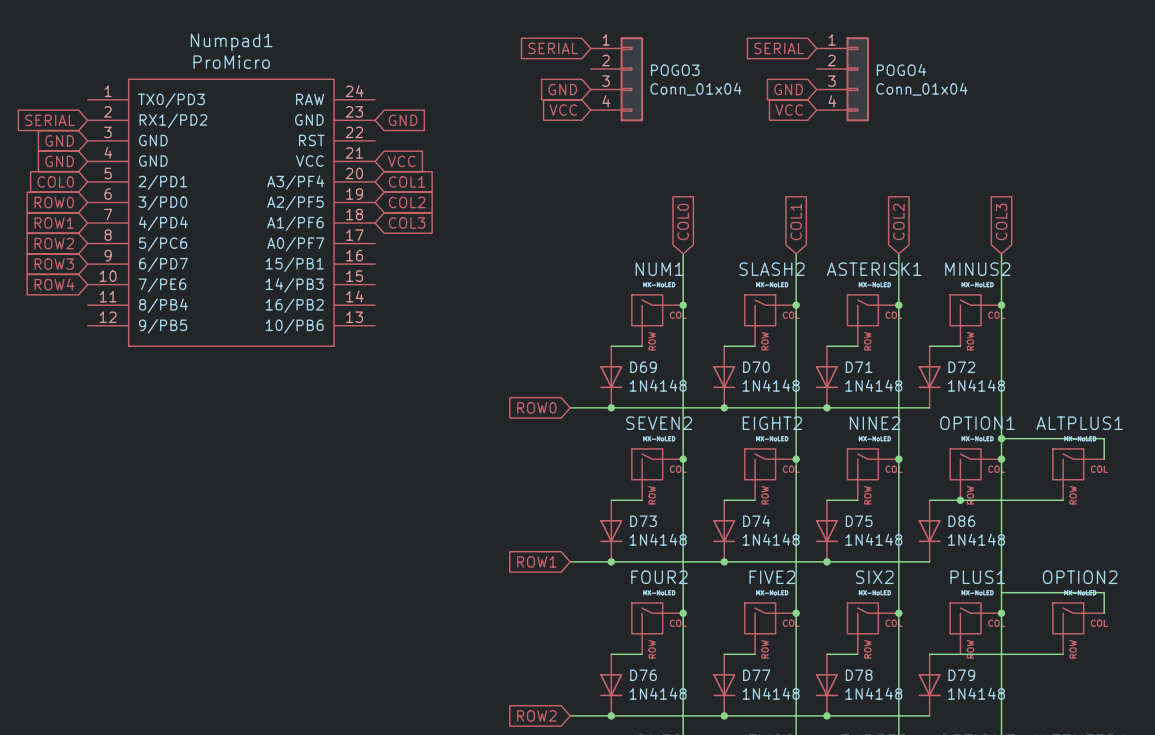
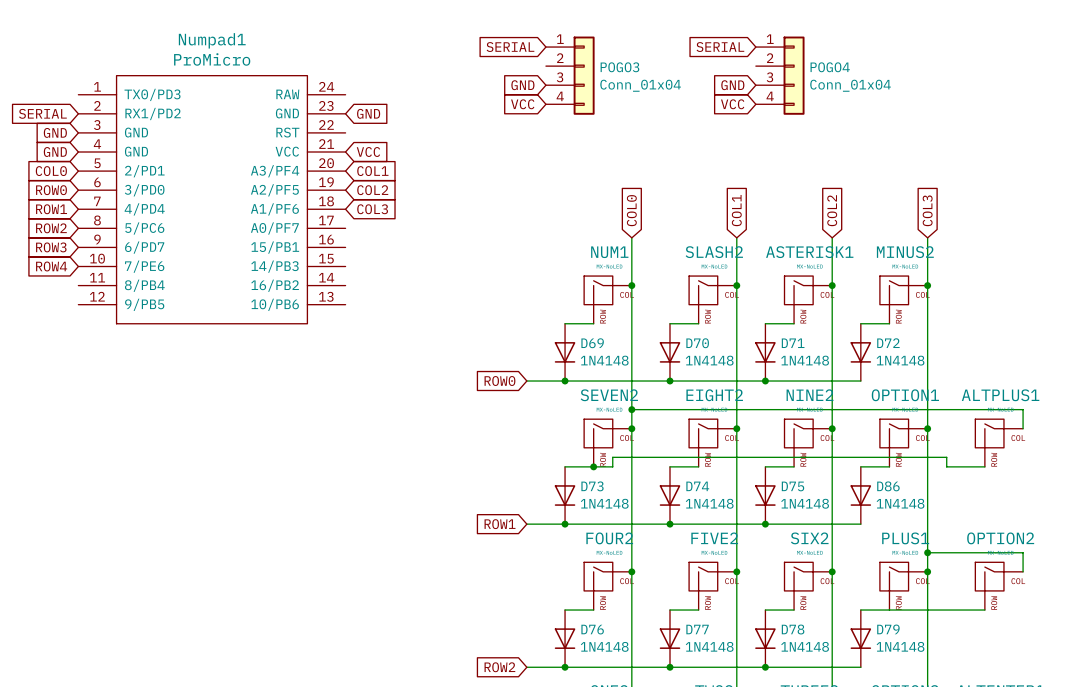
wire: none -> (631, 409) (927, 409)
junction: none -> (631, 409)
junction: (1001, 438) -> none
junction: none -> (593, 466)
wire: (960, 500) (1022, 500) -> (593, 466) (612, 466) (612, 457) (946, 457) (946, 466)
junction: (960, 500) -> none
junction: none -> (927, 552)

